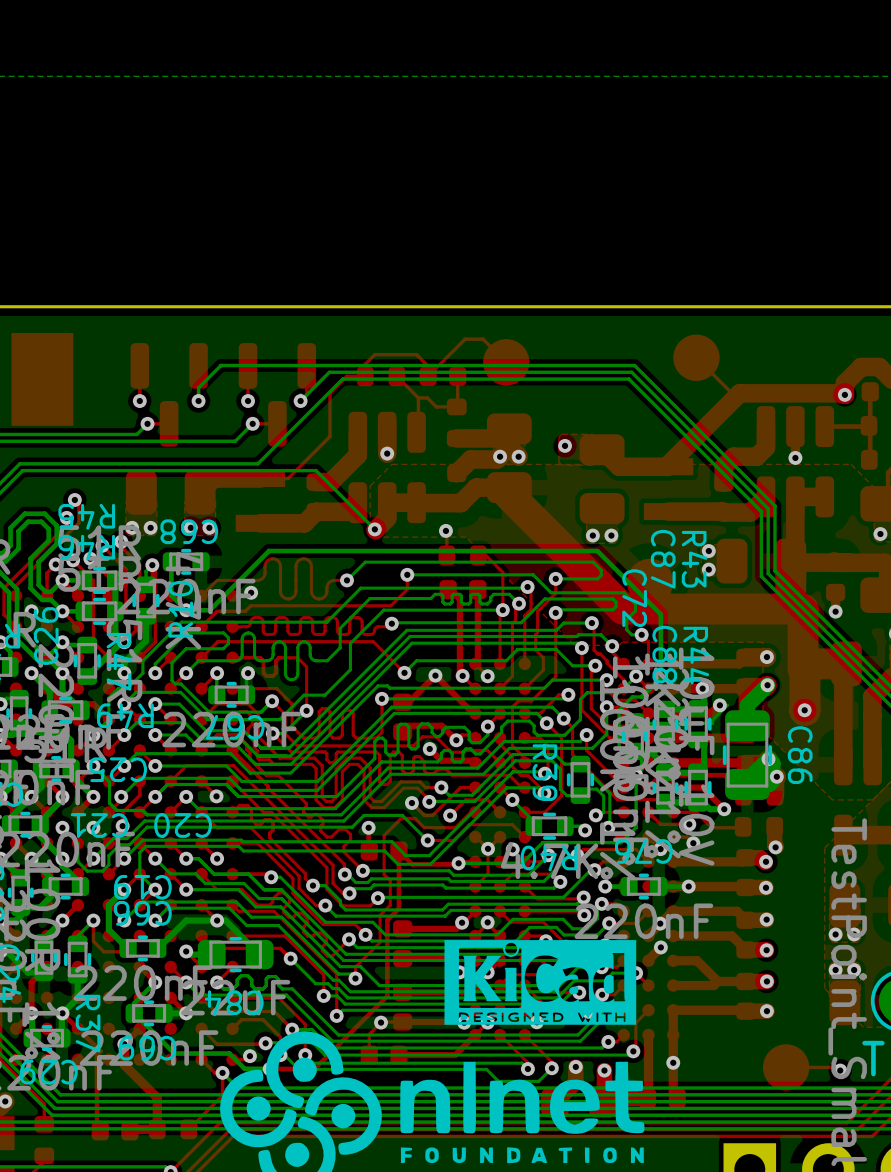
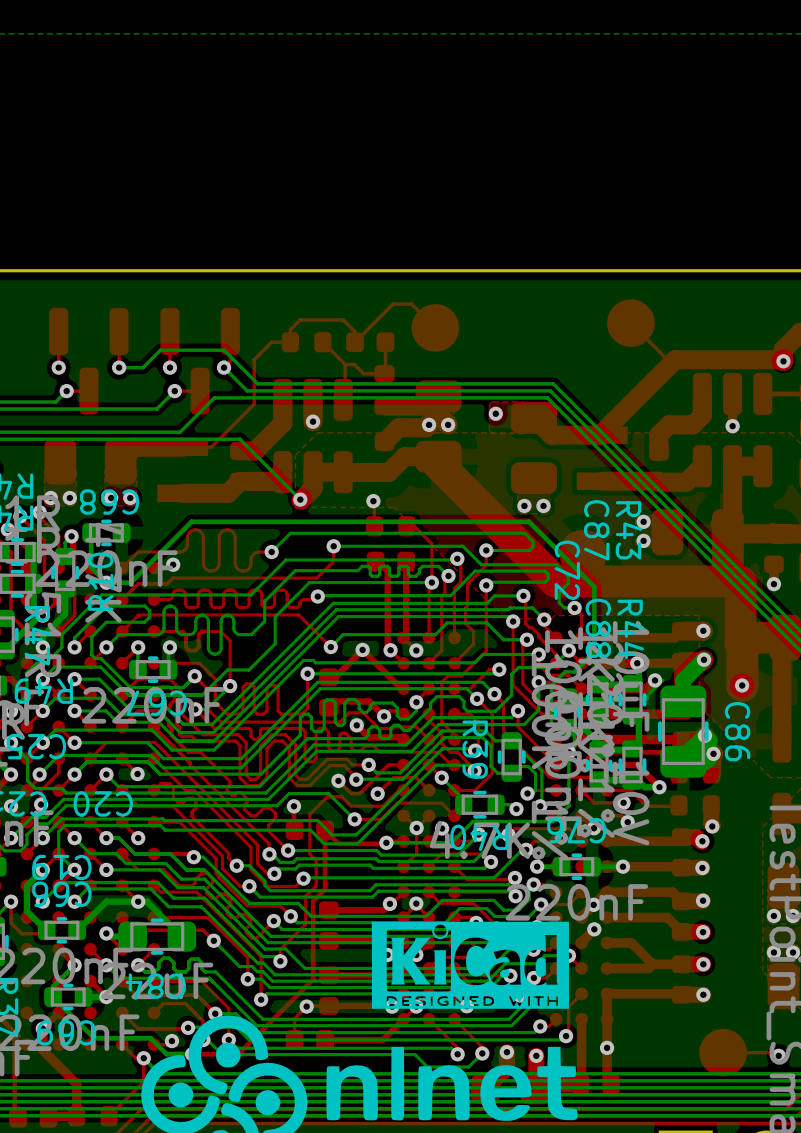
bottom track: (198, 401) (198, 387) (220, 365) (634, 365) (774, 505) (774, 570) -> (119, 367) (143, 367) (160, 350) (224, 350) (257, 383) (553, 383) (711, 542)
bottom track: (300, 401) (329, 372) (631, 372) (768, 508) (768, 573) -> (224, 367) (247, 390) (550, 390) (704, 545)
bottom track: (291, 430) (342, 379) (628, 379) (761, 511) (761, 576) -> (214, 397) (547, 397) (697, 547)

